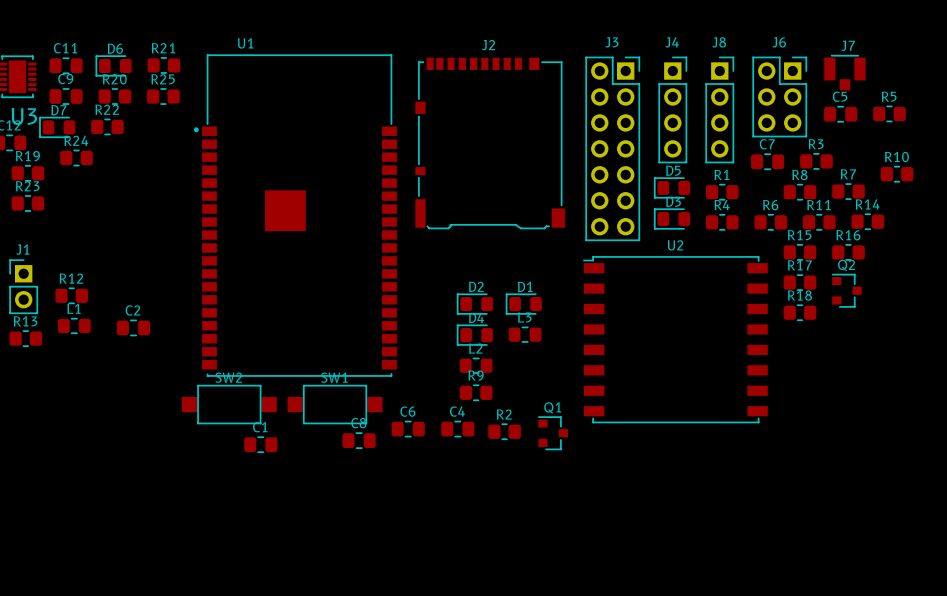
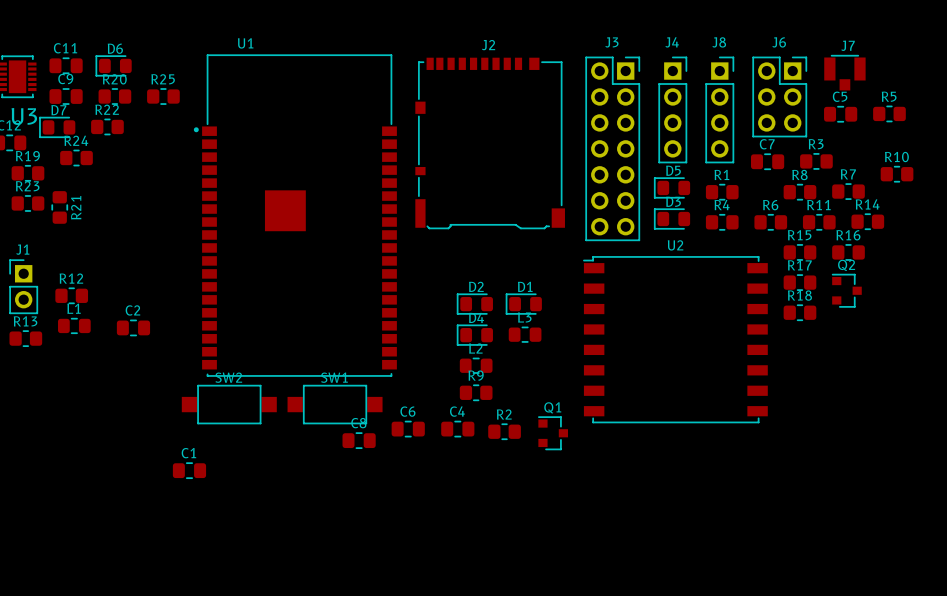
R21 rotation: 0° (163, 65) -> 90° clockwise (59, 207)
R21 position: (163, 65) -> (59, 207)
C1 position: (260, 444) -> (189, 470)

